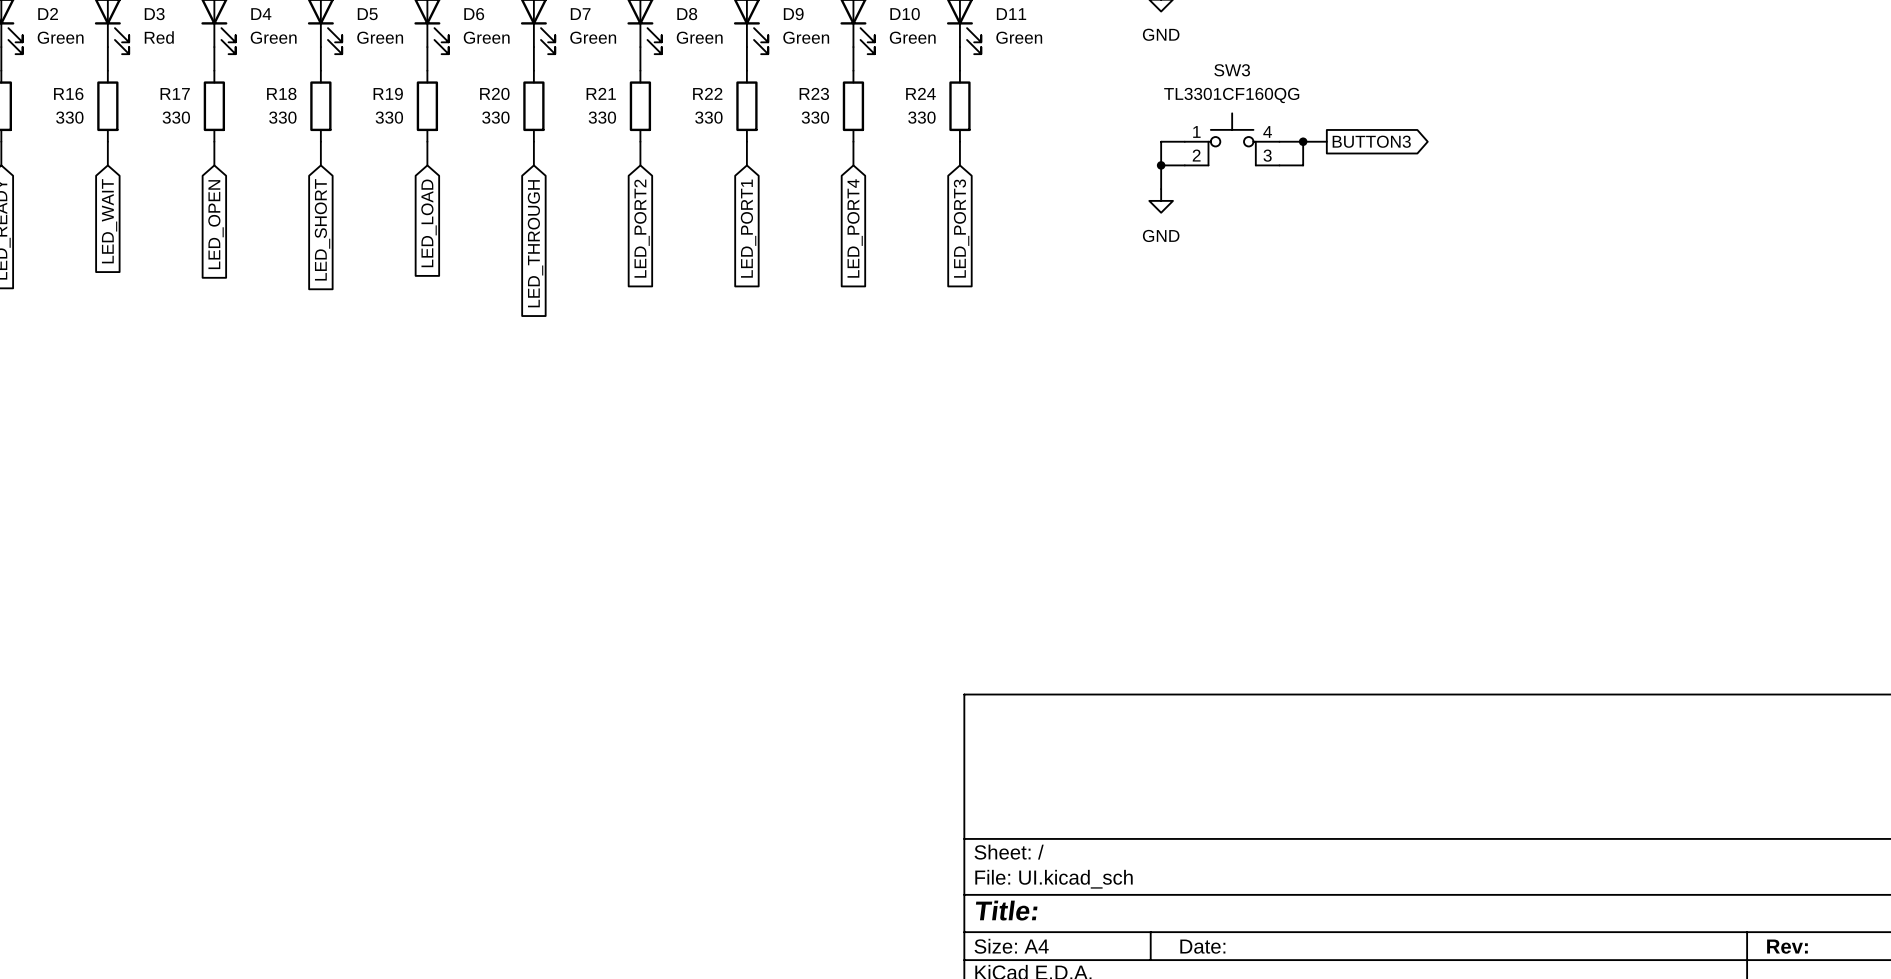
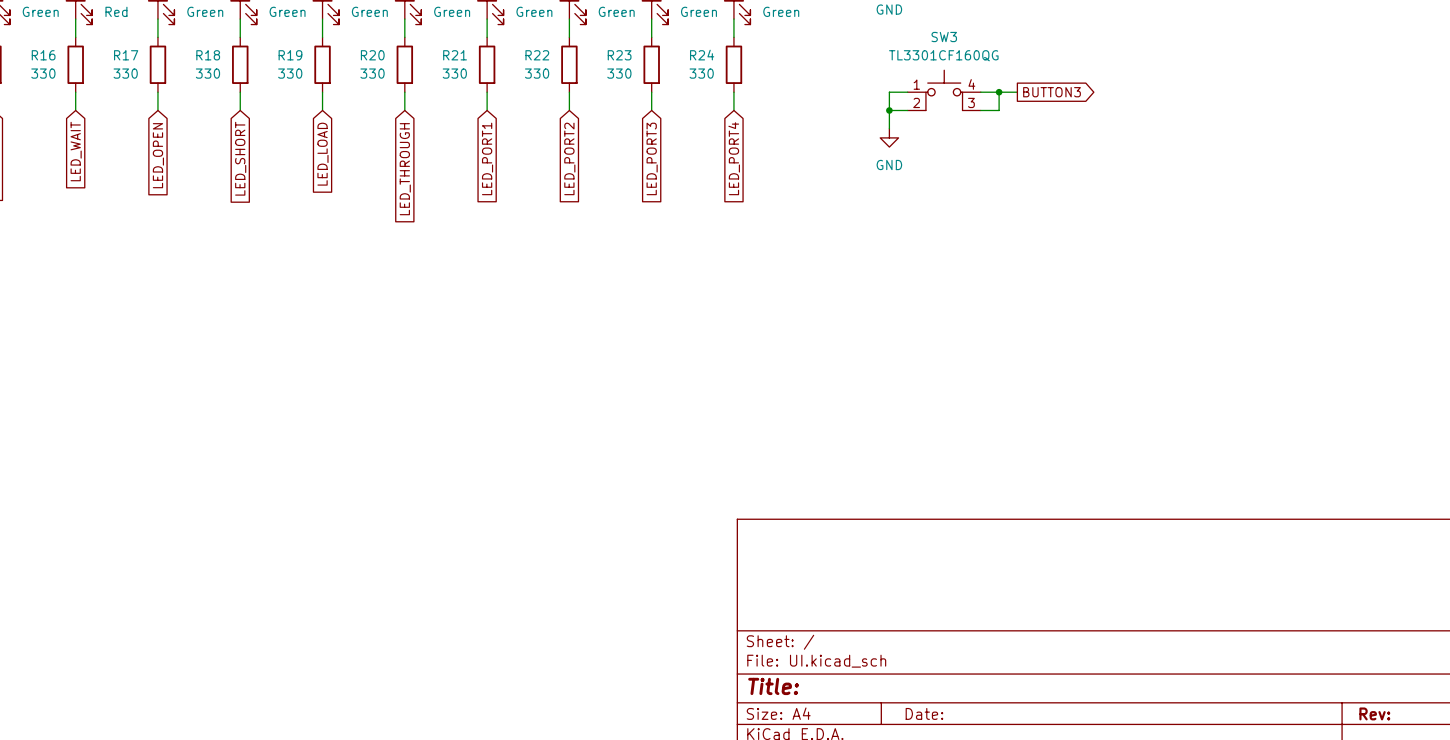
global label: LED_PORT2 (642, 228) -> LED_PORT1 (487, 158)
global label: LED_PORT1 (748, 228) -> LED_PORT2 (569, 158)
global label: LED_PORT4 (855, 228) -> LED_PORT3 (652, 158)
global label: LED_PORT3 (961, 228) -> LED_PORT4 (734, 158)

